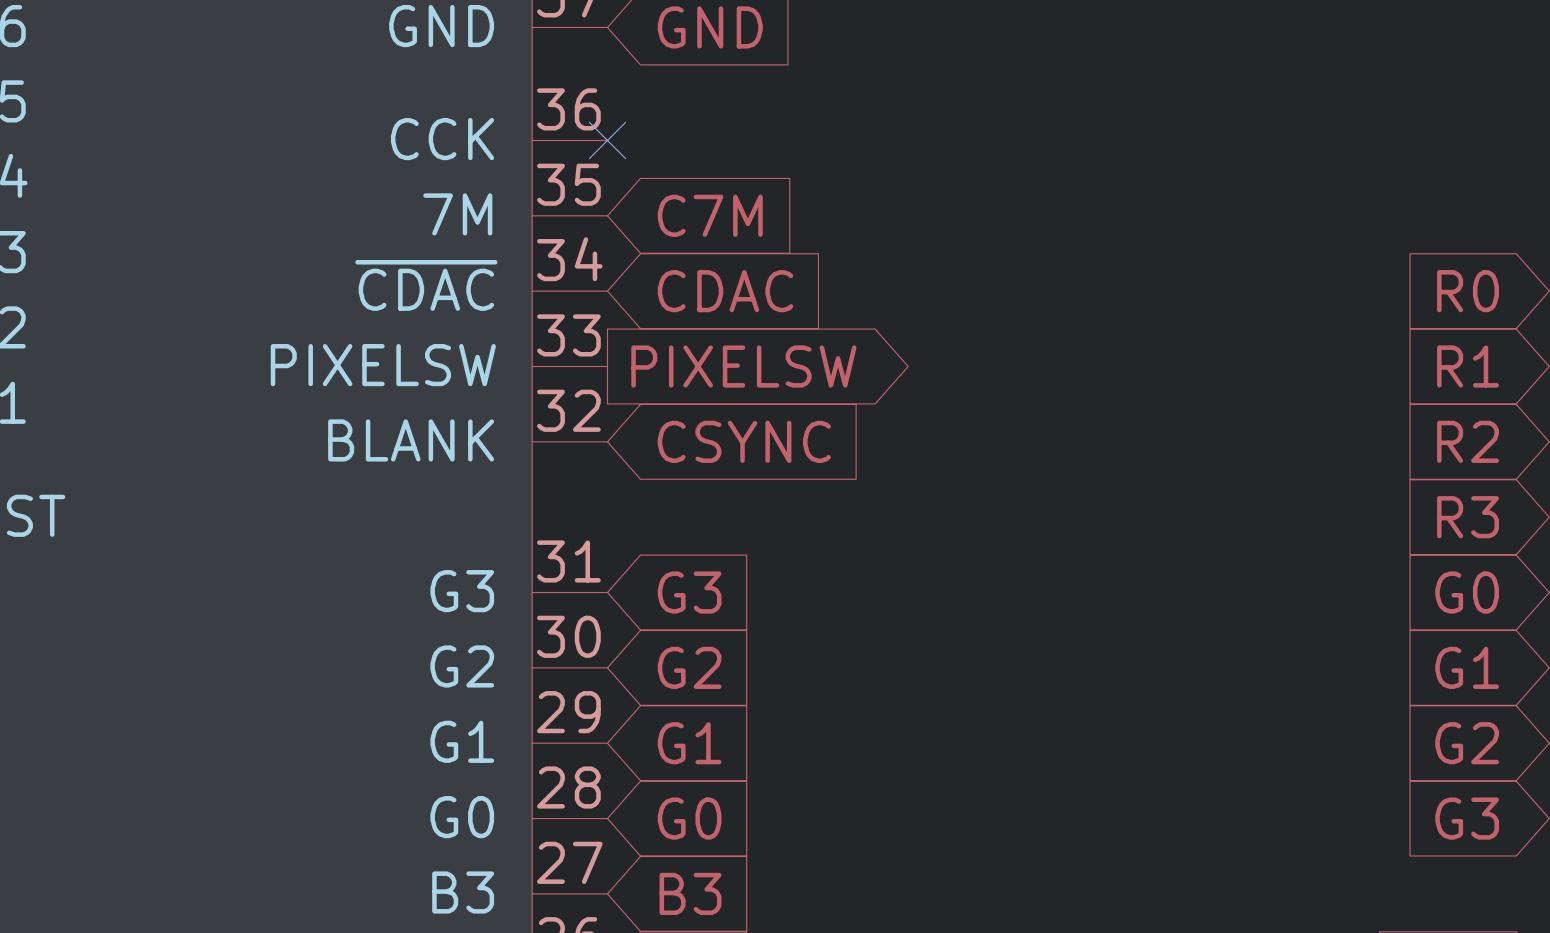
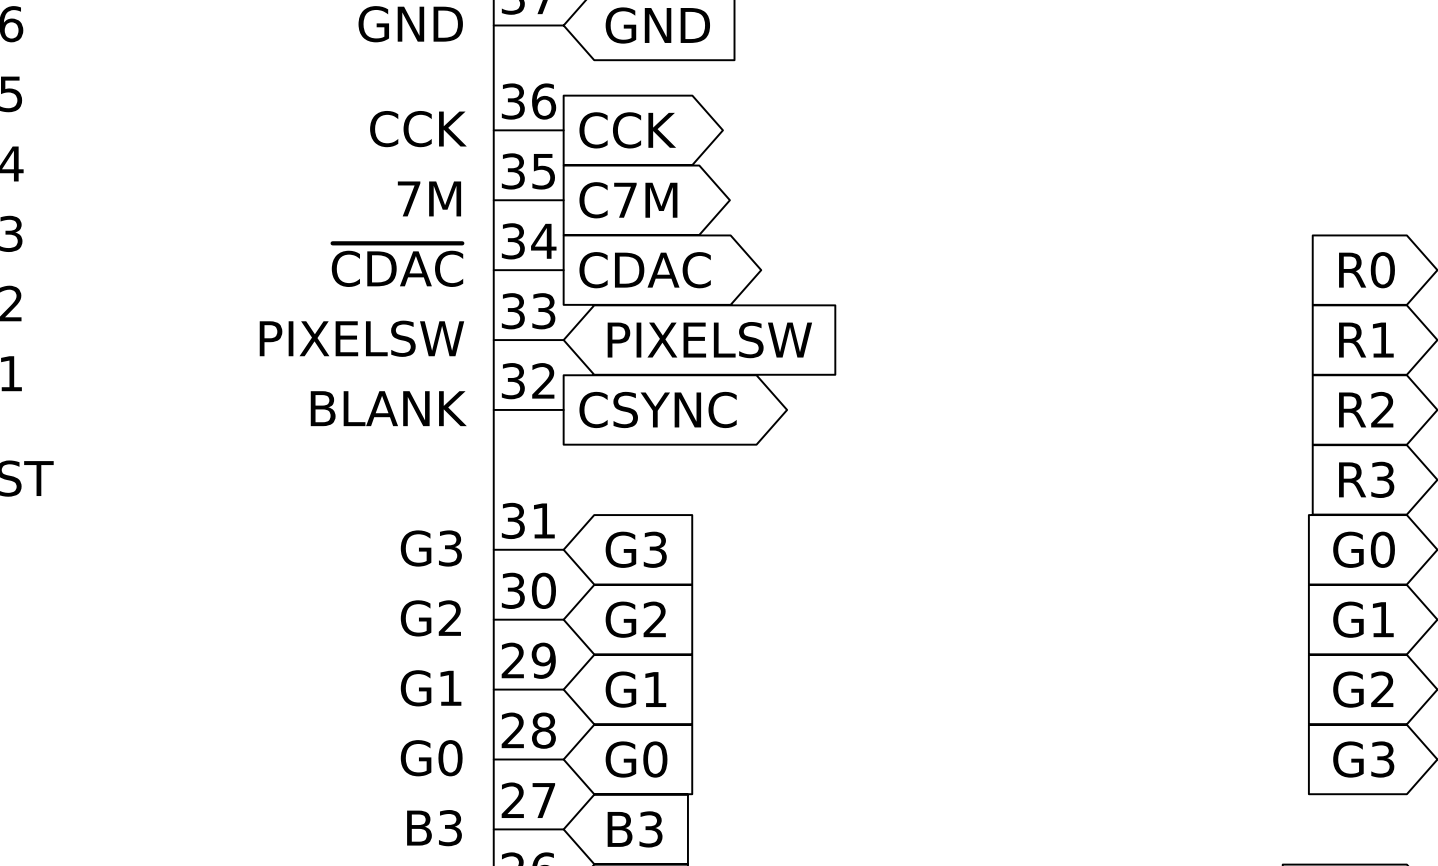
no-connect mark: (607, 140) -> none
global label: none -> CCK (627, 130)
global label shape: input (710, 215) -> output (628, 200)
global label shape: input (725, 291) -> output (645, 270)
global label shape: output (743, 366) -> input (709, 340)
global label shape: input (744, 441) -> output (658, 409)

